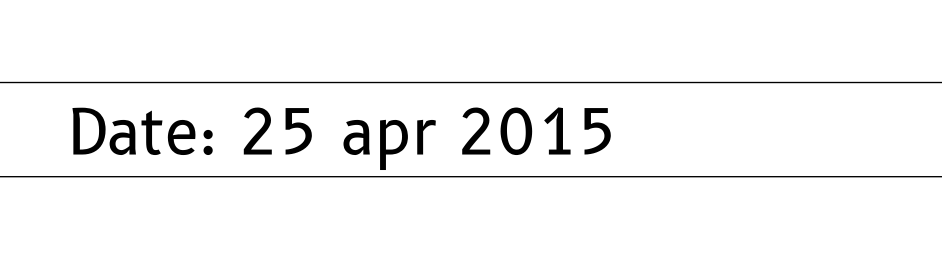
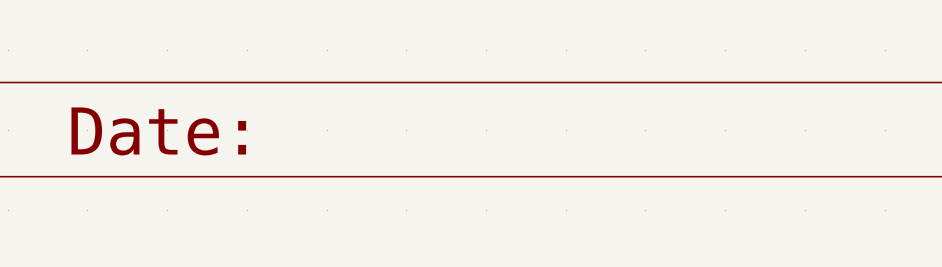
title block: Date: 25 apr 2015 (341, 138) -> Date: (158, 131)

